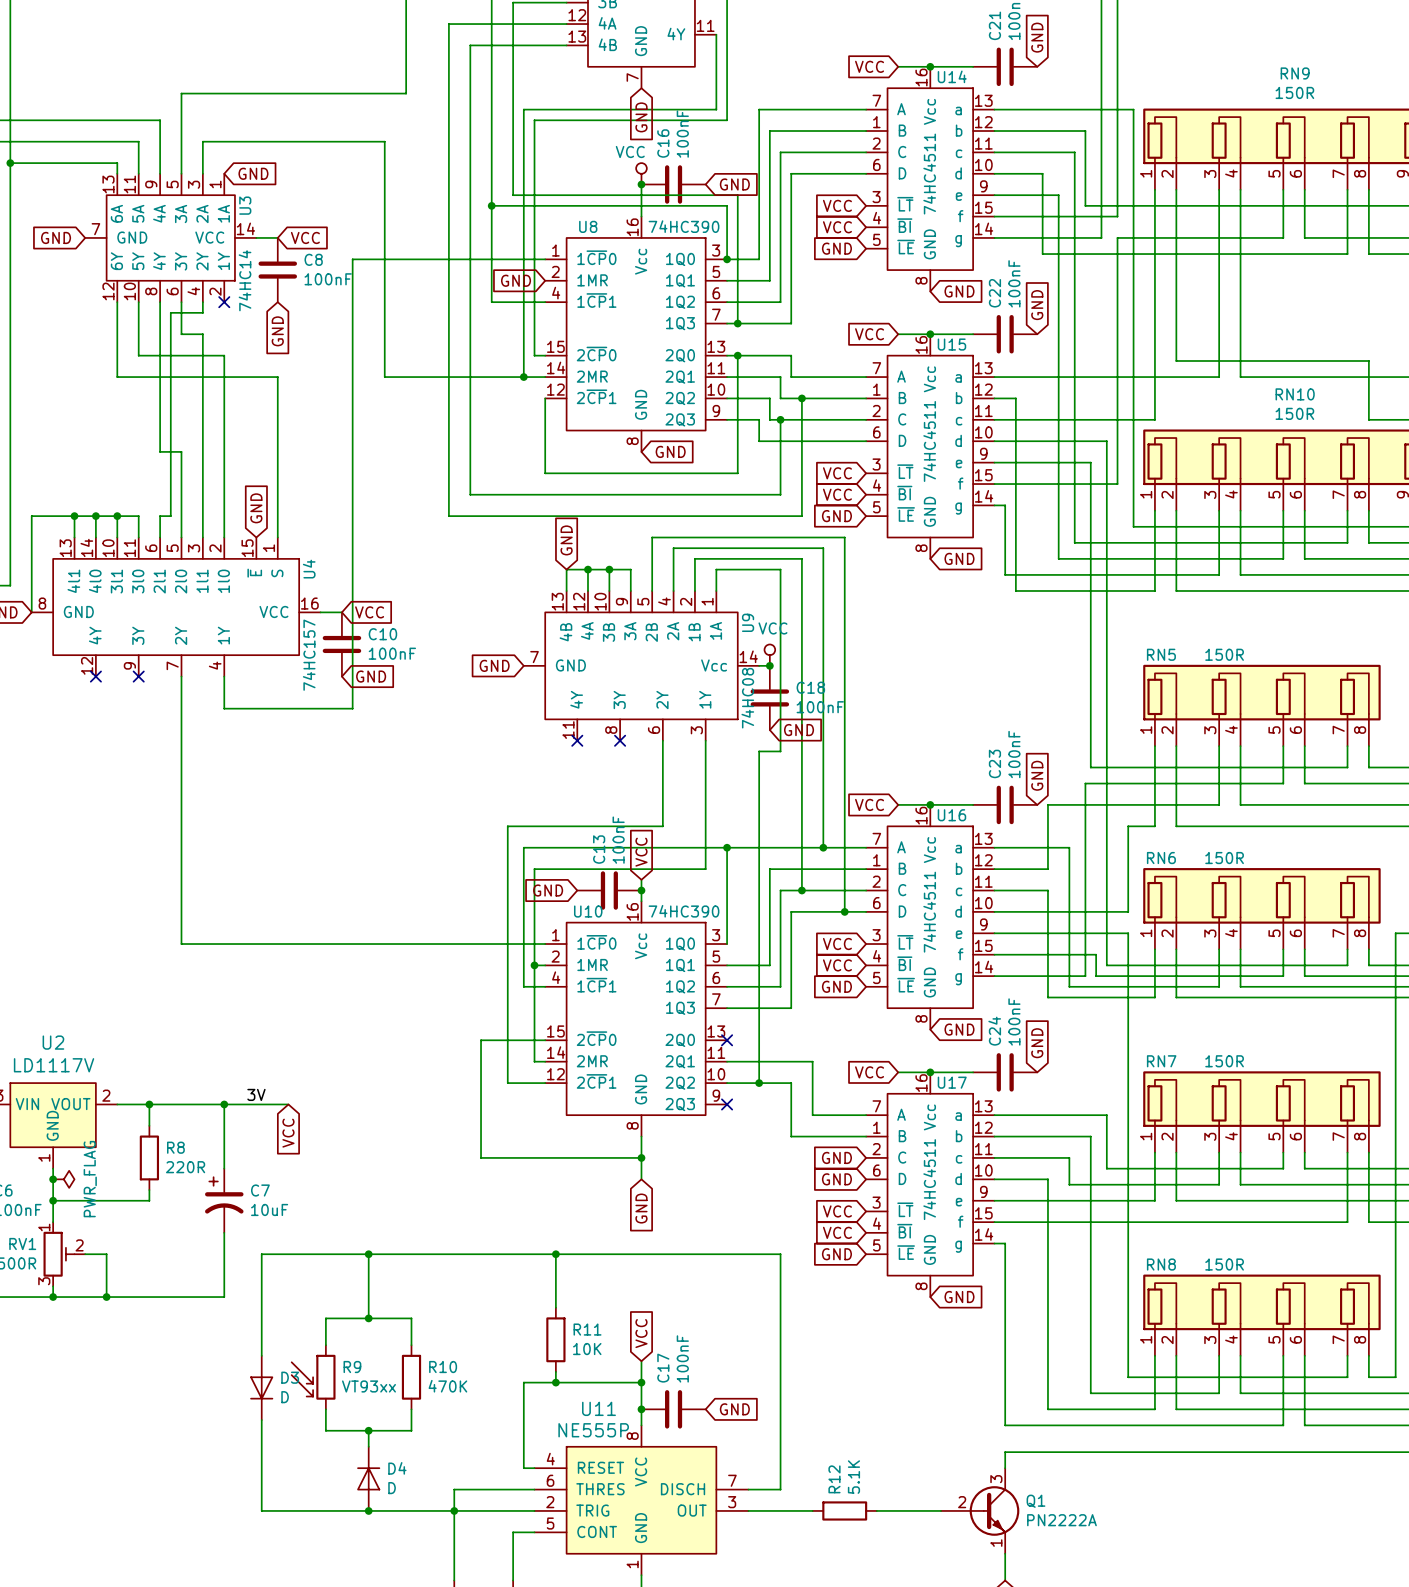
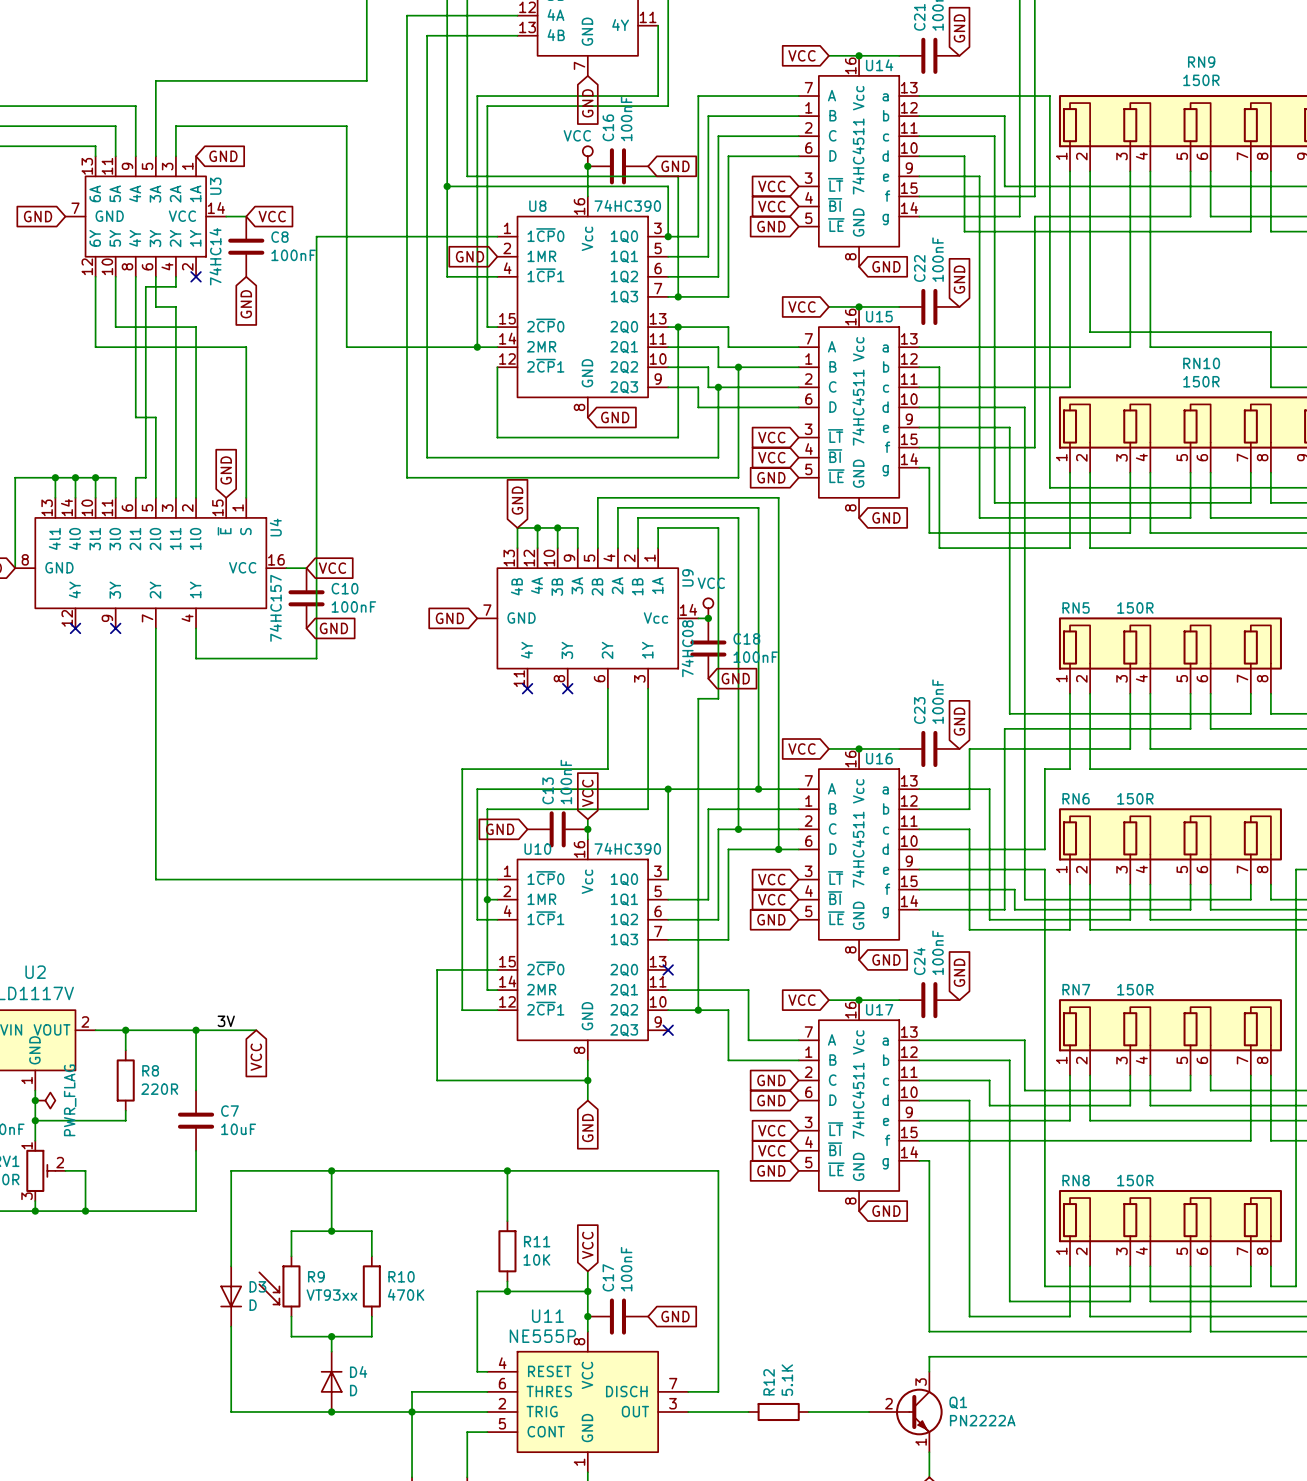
C7 symbol: [205, 1168, 244, 1233] -> [177, 1090, 215, 1151]

